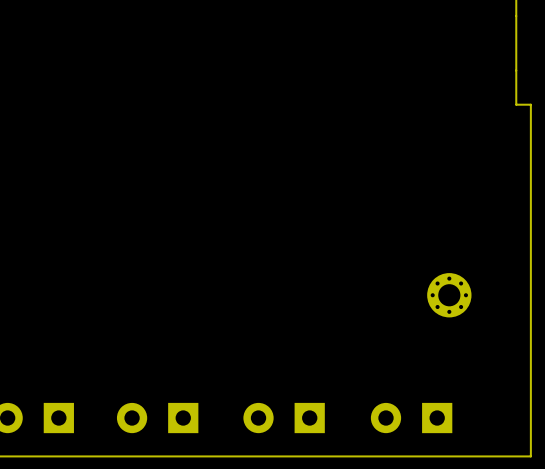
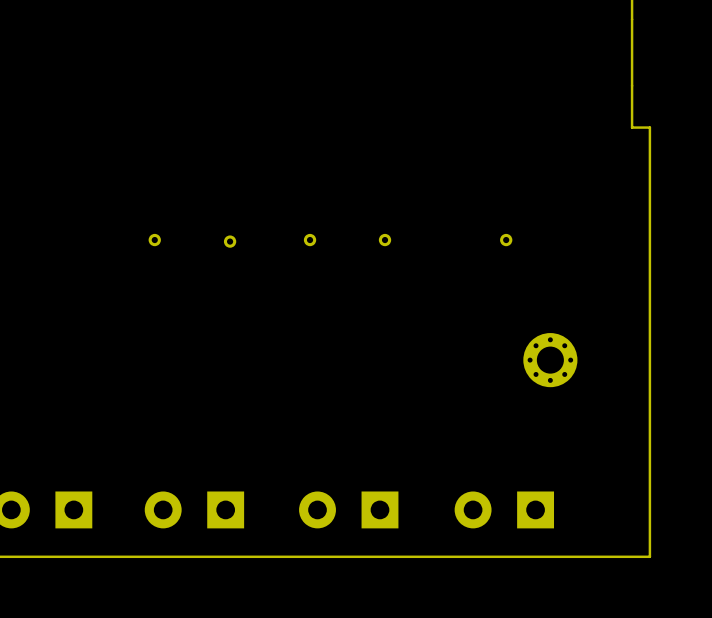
part: none -> (154, 240)
part: none -> (310, 240)
part: none -> (385, 240)
part: none -> (506, 240)
part: none -> (230, 241)

